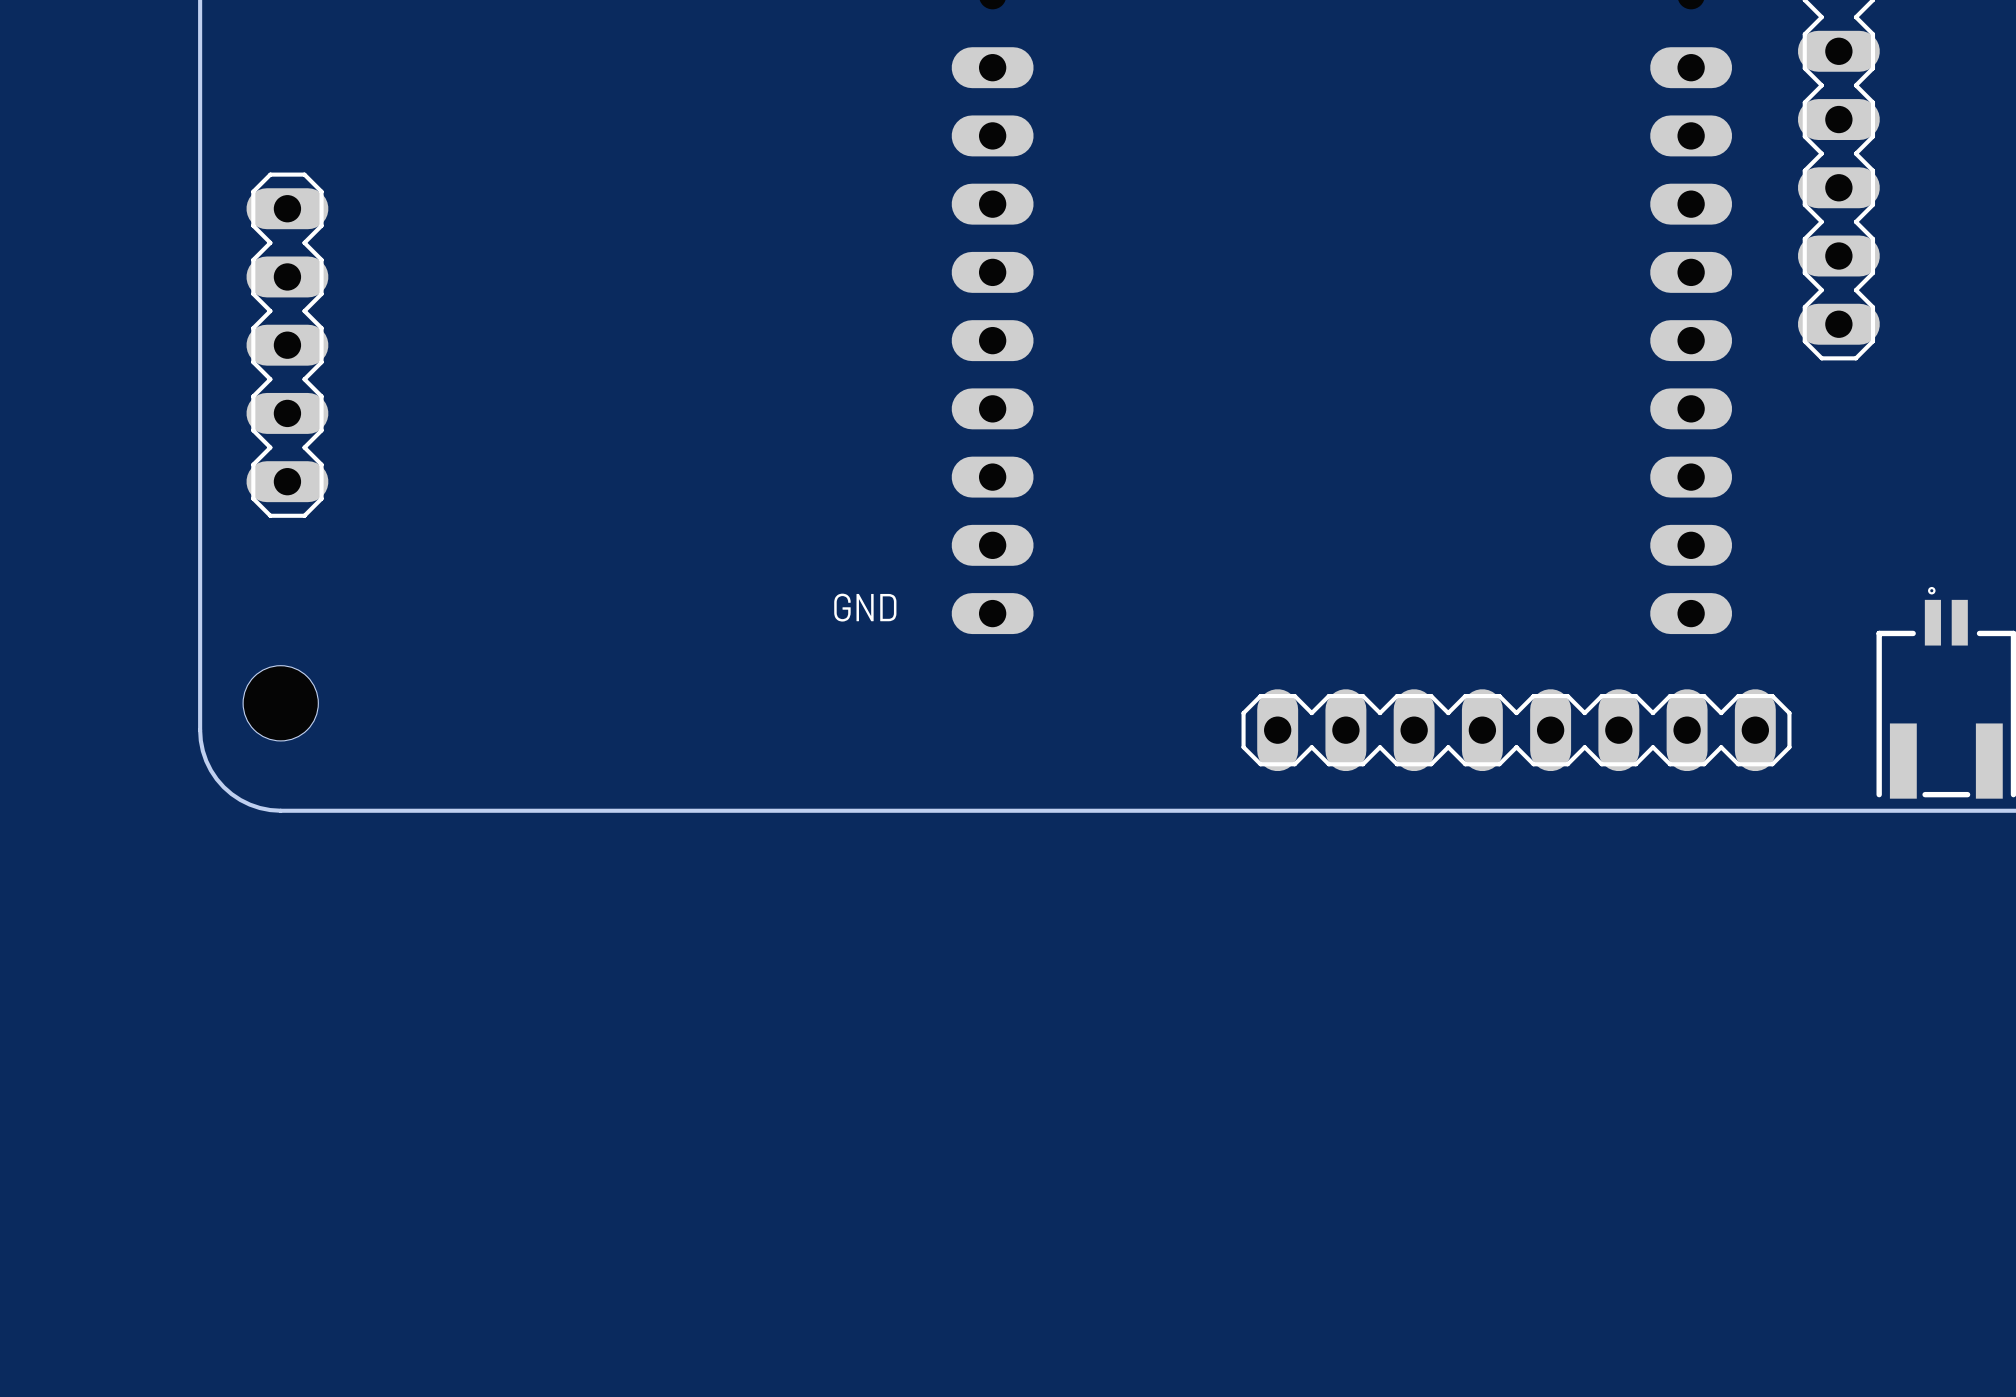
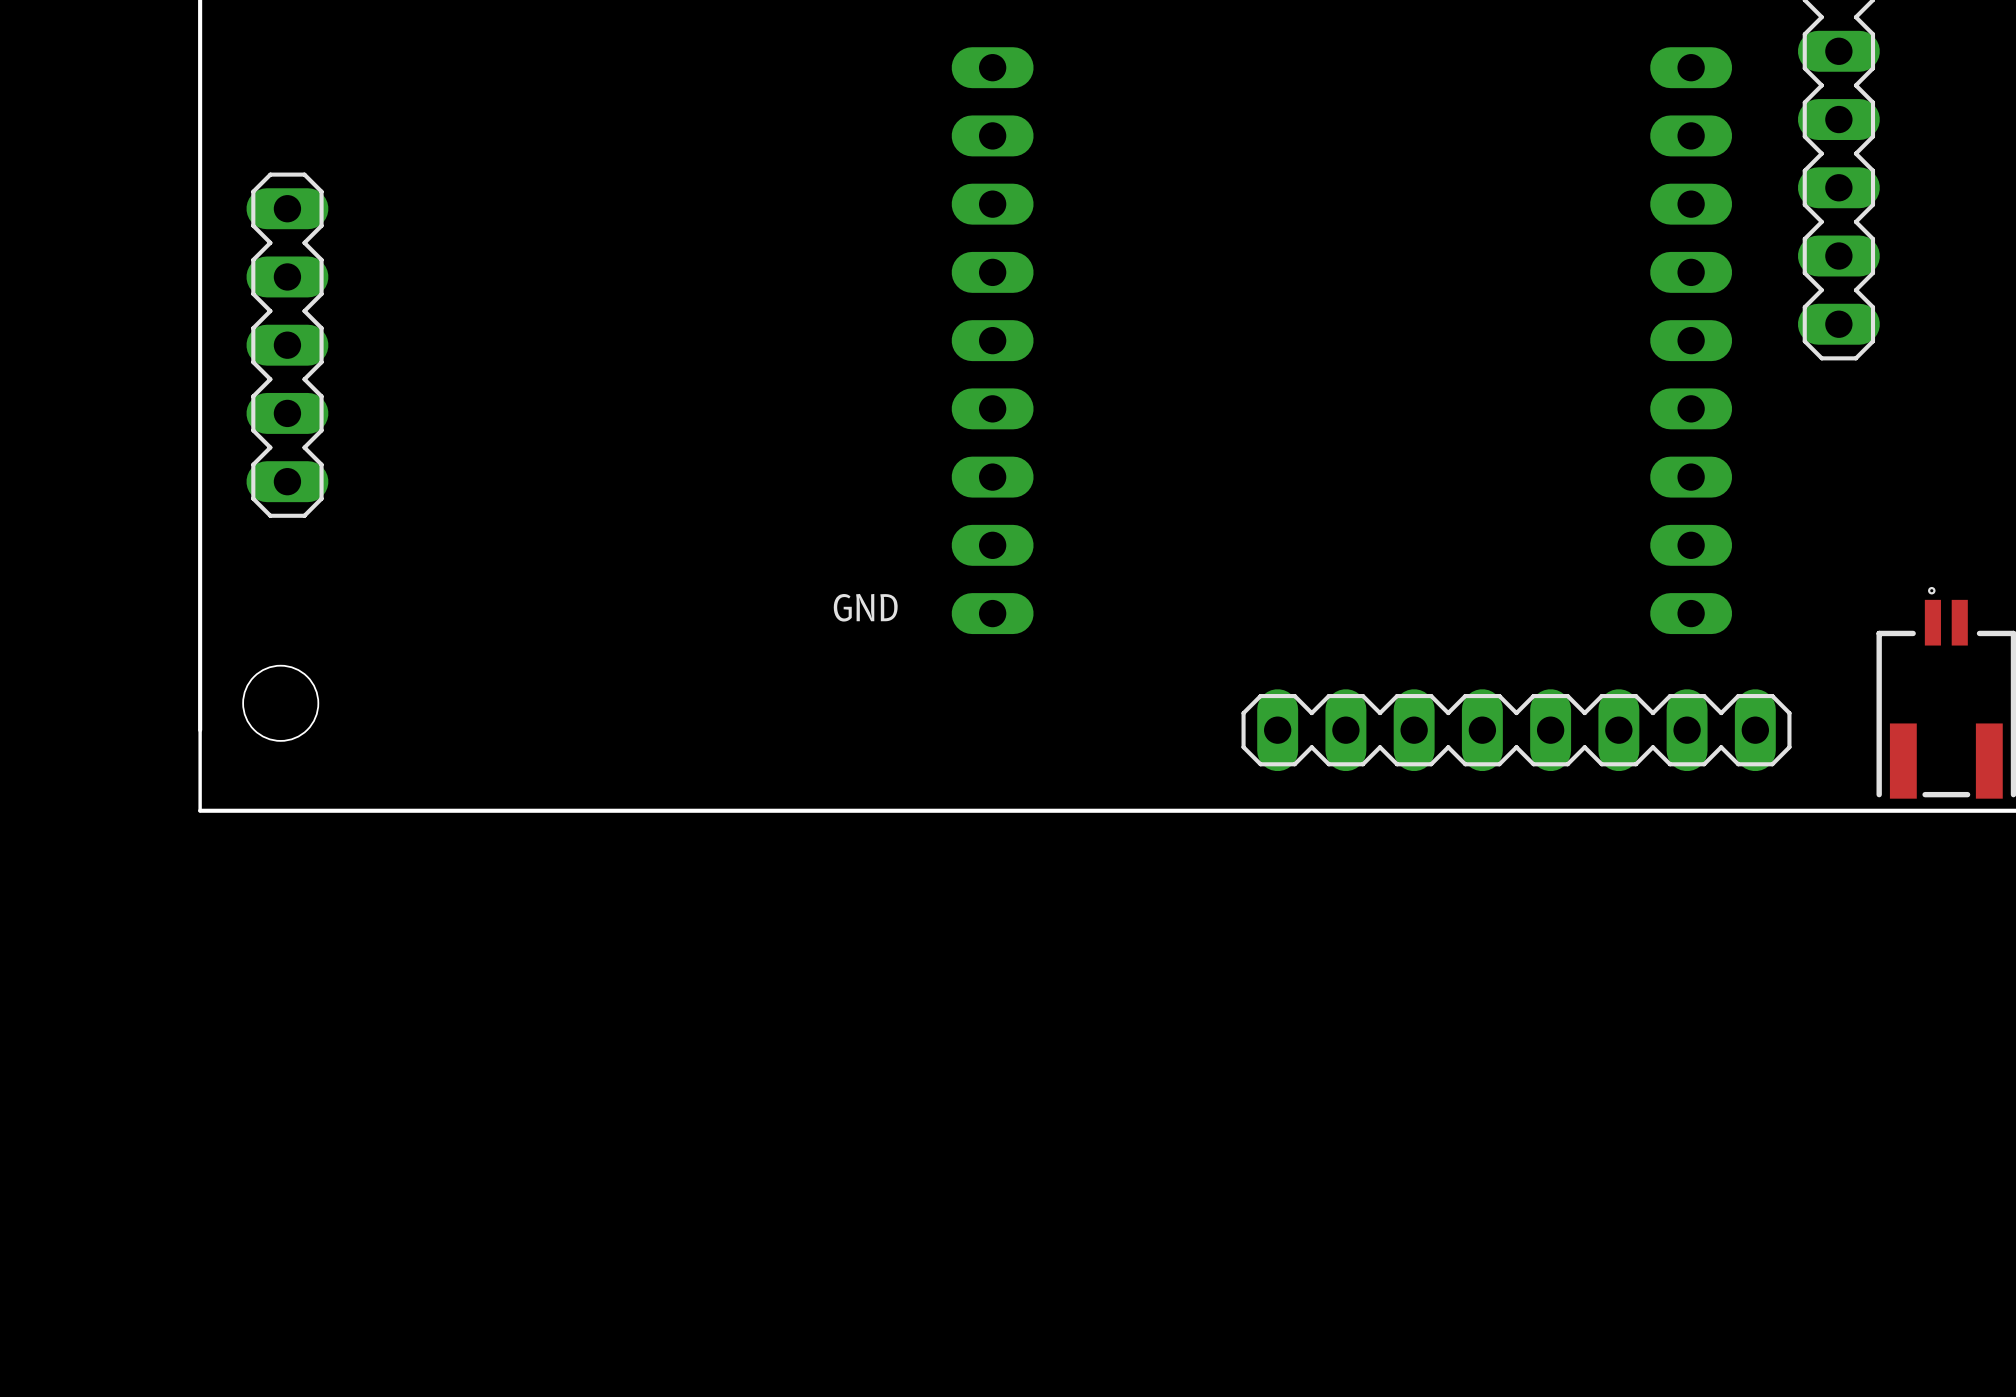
board edge: (200, 730) (206, 761) (223, 787) (249, 804) (280, 810) -> (200, 730) (200, 810) (280, 810)

